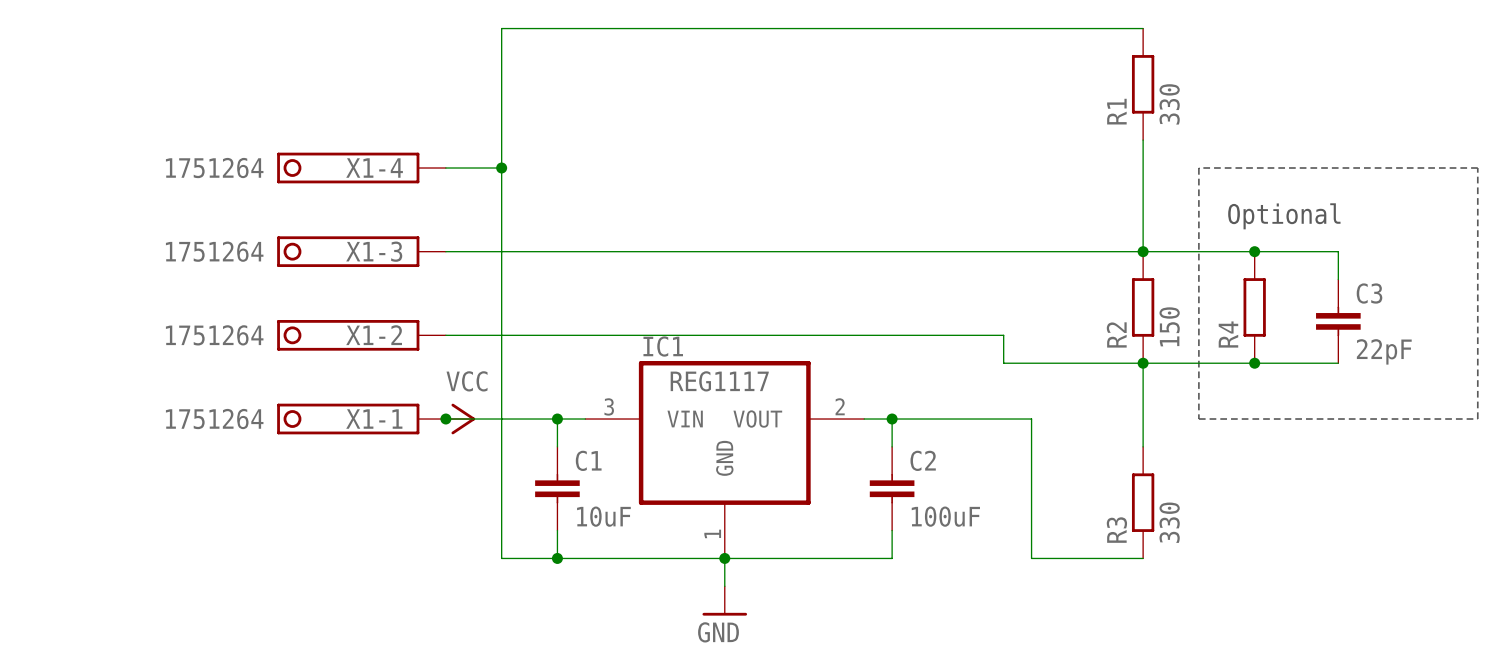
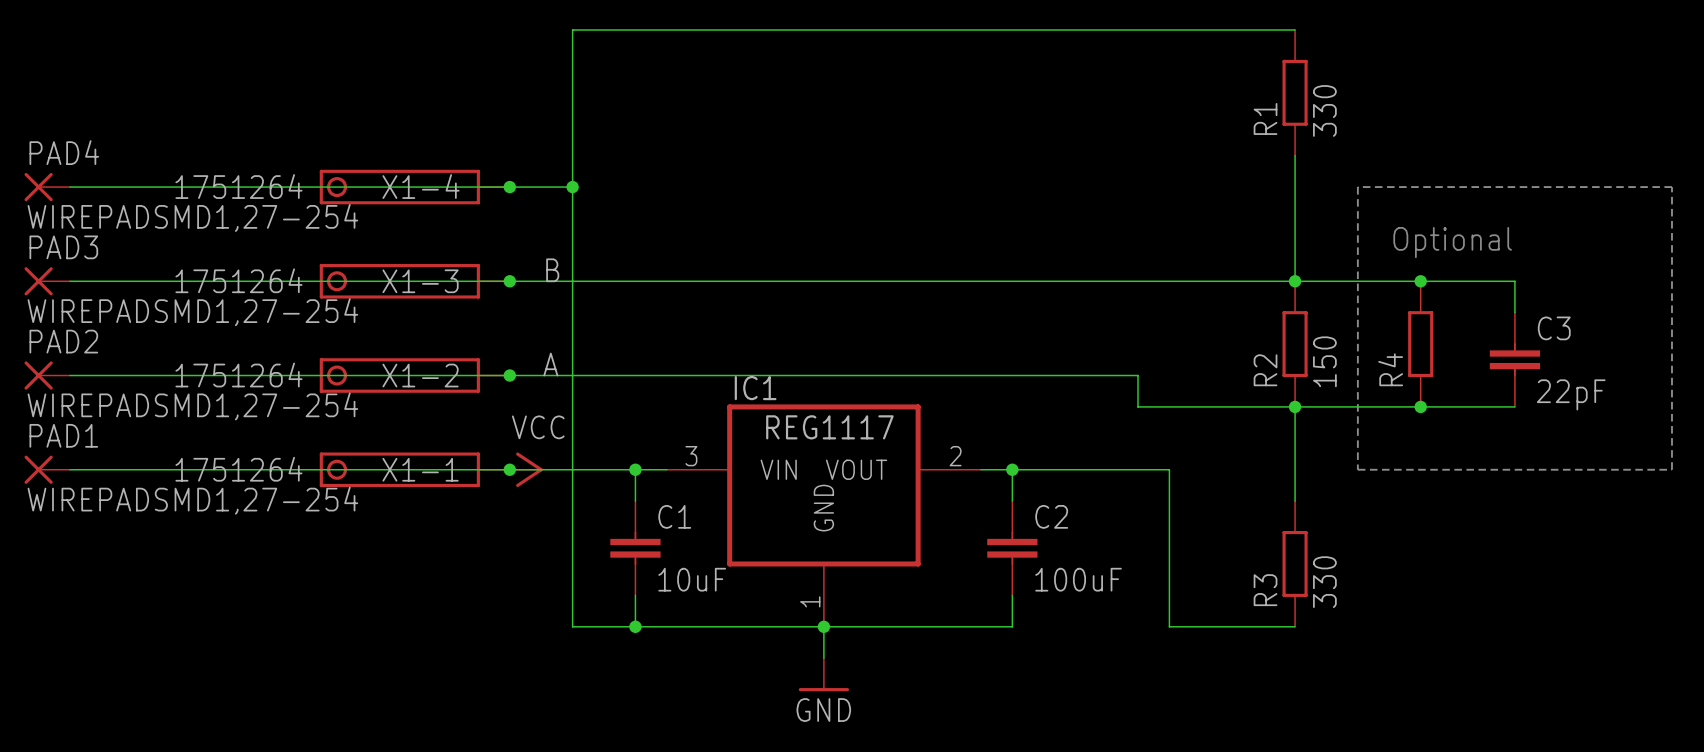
PAD4: none -> WIREPADSMD1,27-254 (47, 187)
wire: none -> (70, 187) (509, 187)
junction: none -> (509, 187)
label: none -> B (552, 270)
PAD3: none -> WIREPADSMD1,27-254 (47, 281)
wire: none -> (70, 281) (509, 281)
junction: none -> (509, 281)
label: none -> A (550, 364)
PAD2: none -> WIREPADSMD1,27-254 (47, 375)
wire: none -> (70, 375) (509, 375)
junction: none -> (509, 375)
PAD1: none -> WIREPADSMD1,27-254 (47, 469)
wire: none -> (70, 469) (509, 469)

